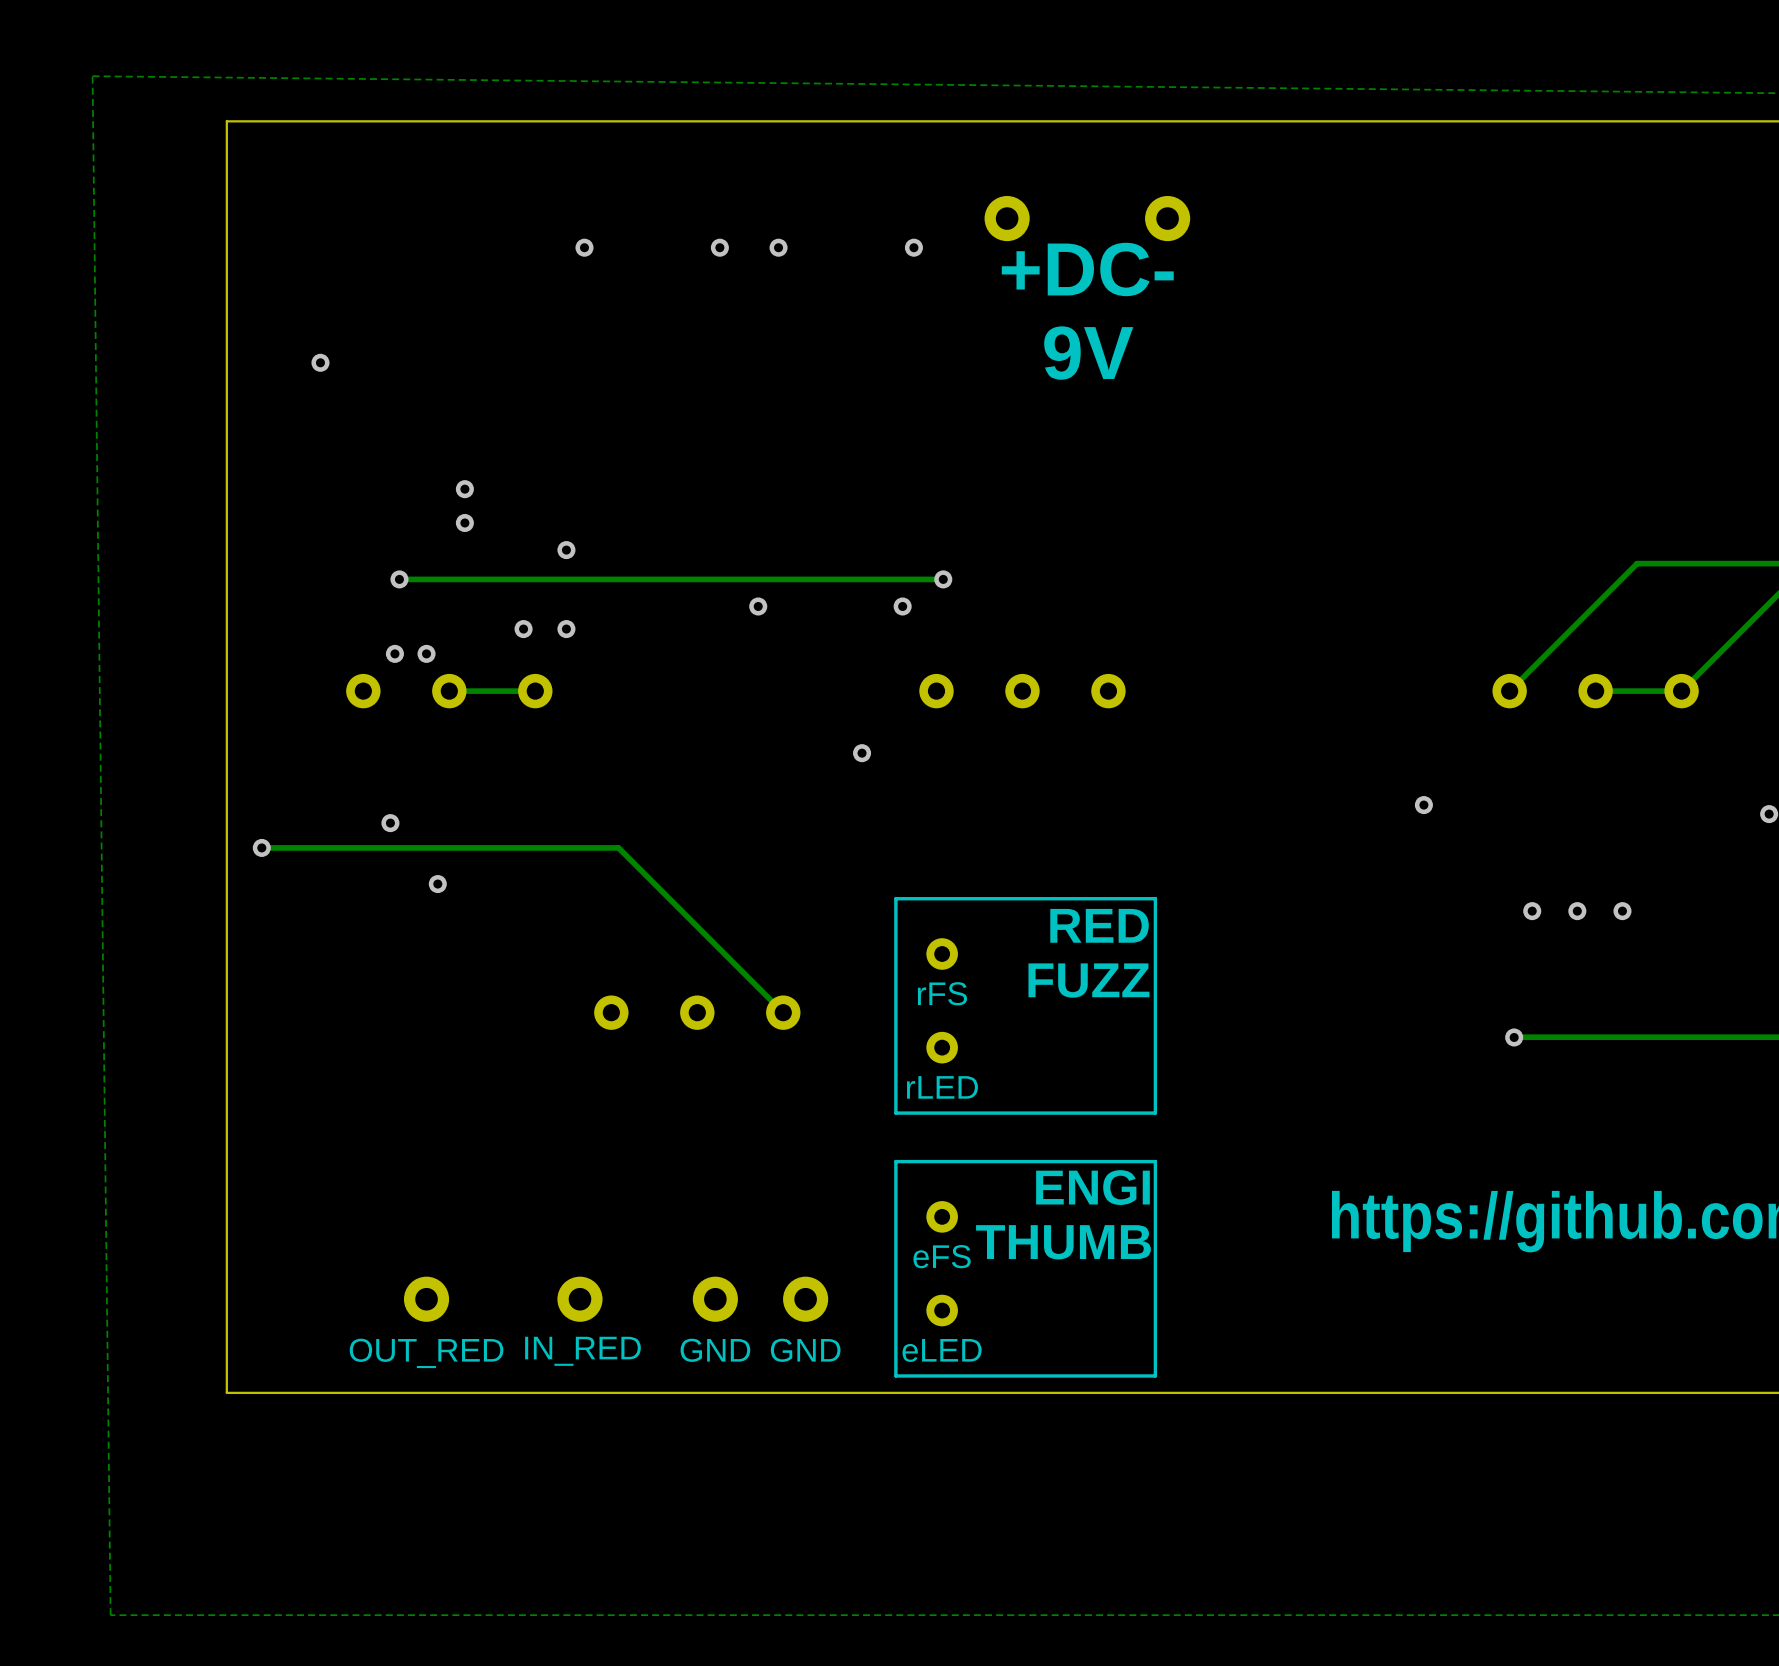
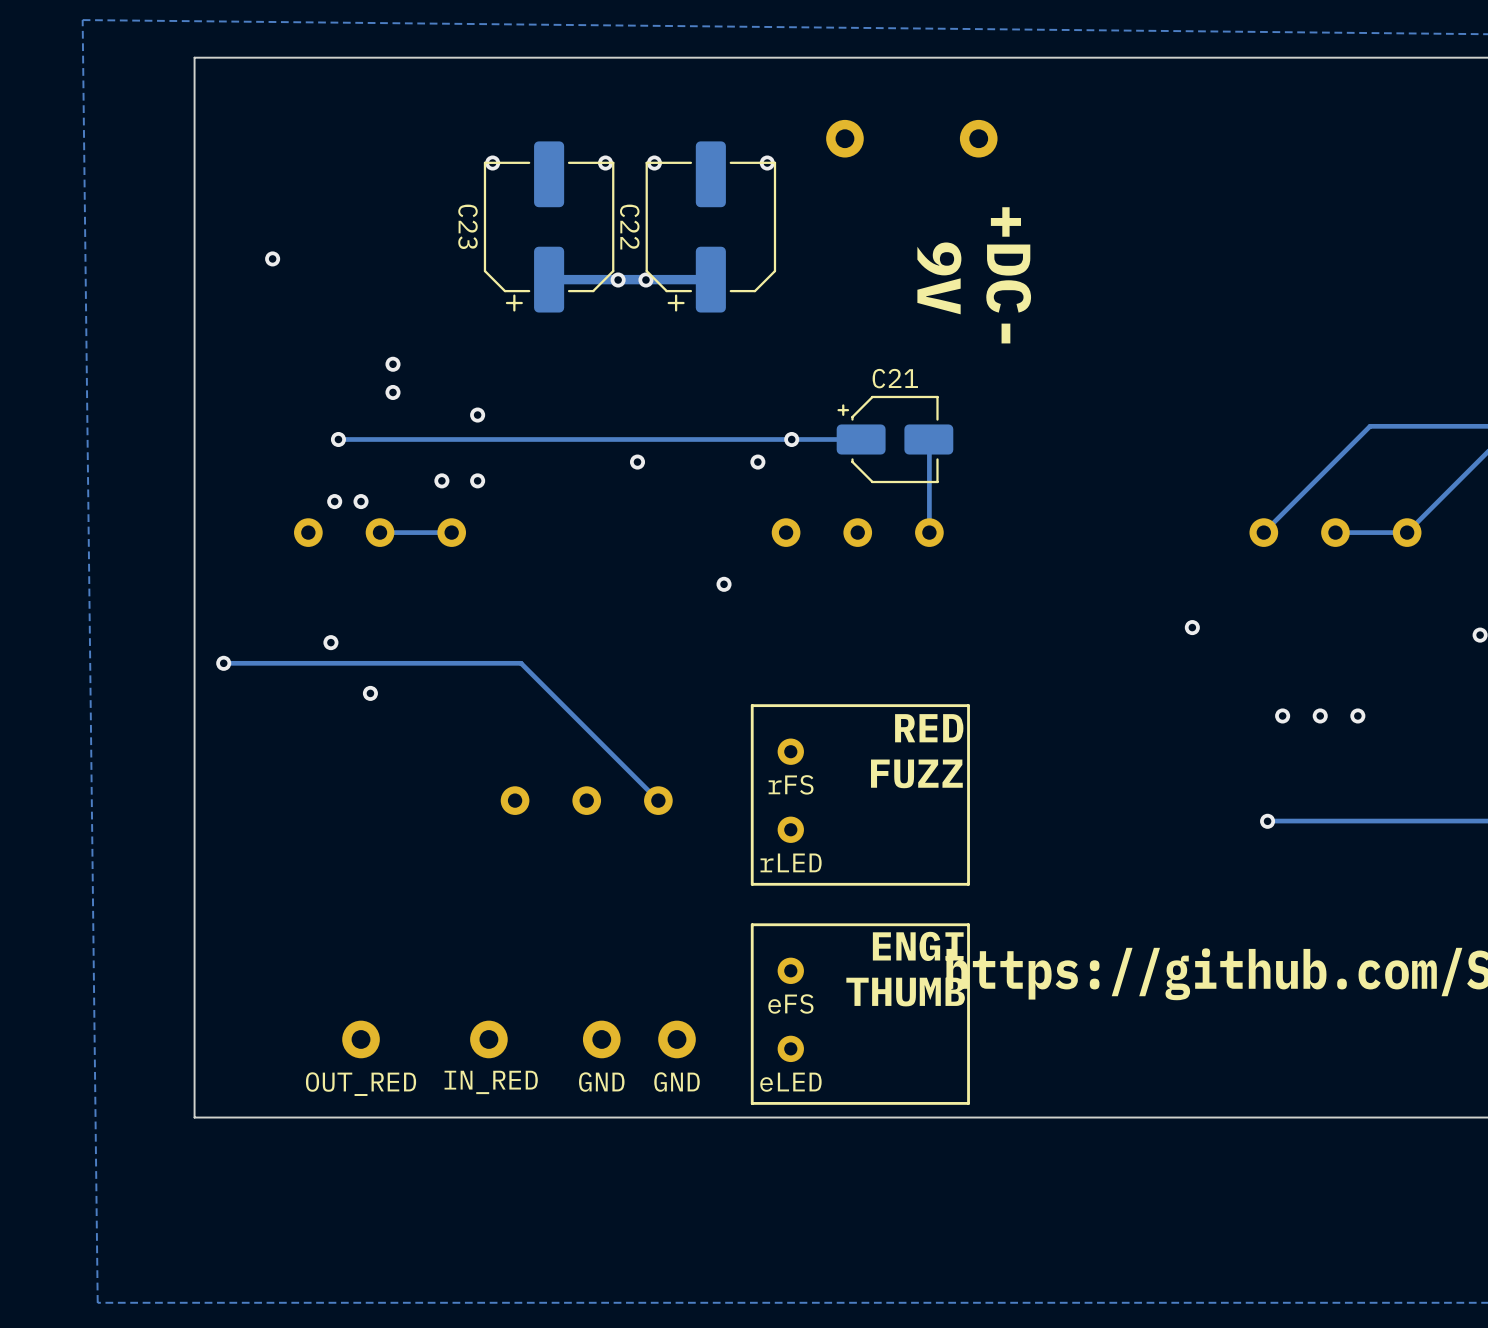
text rotation: 0° (1087, 269) -> 90° clockwise (1008, 275)
C23: none -> (549, 226)
C22: none -> (710, 226)
text rotation: 0° (1088, 353) -> 90° clockwise (939, 278)
track: none -> (710, 279) (549, 279)
via: none -> (618, 280)
via: none -> (645, 280)
track: none -> (861, 439) (791, 439)
C21: none -> (894, 439)
track: none -> (928, 439) (929, 532)

